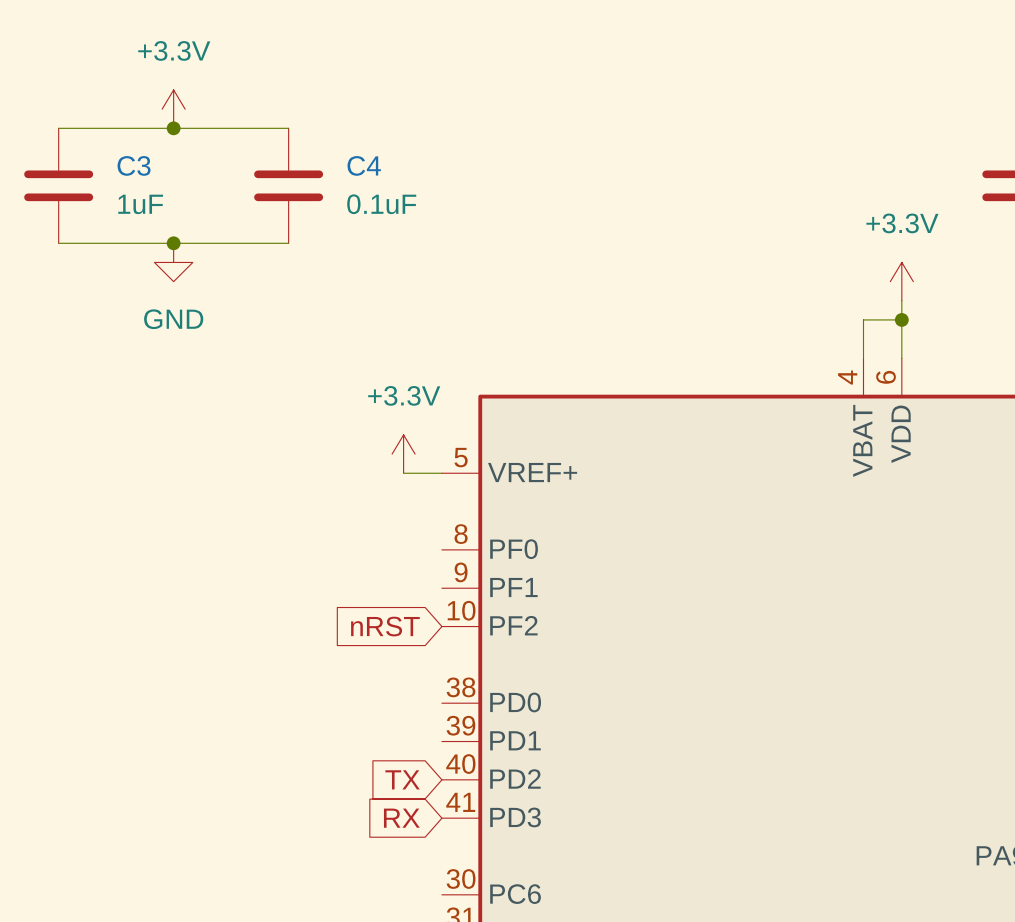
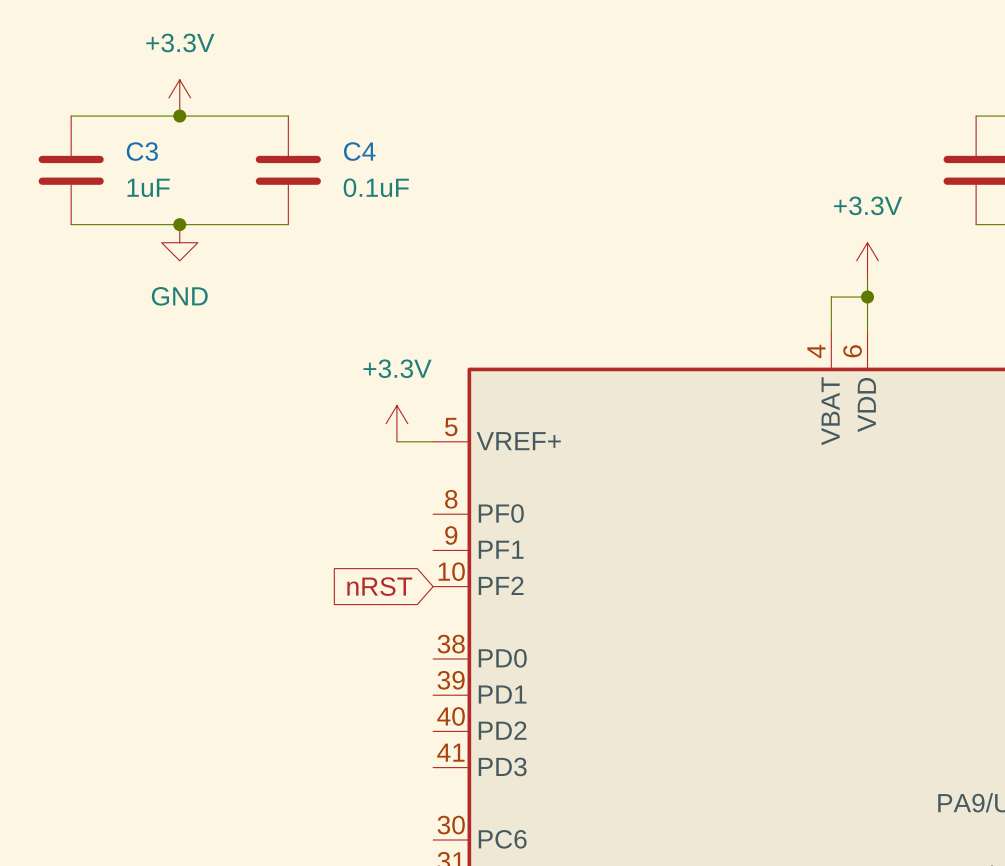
global label: TX (402, 779) -> none
global label: RX (401, 818) -> none

